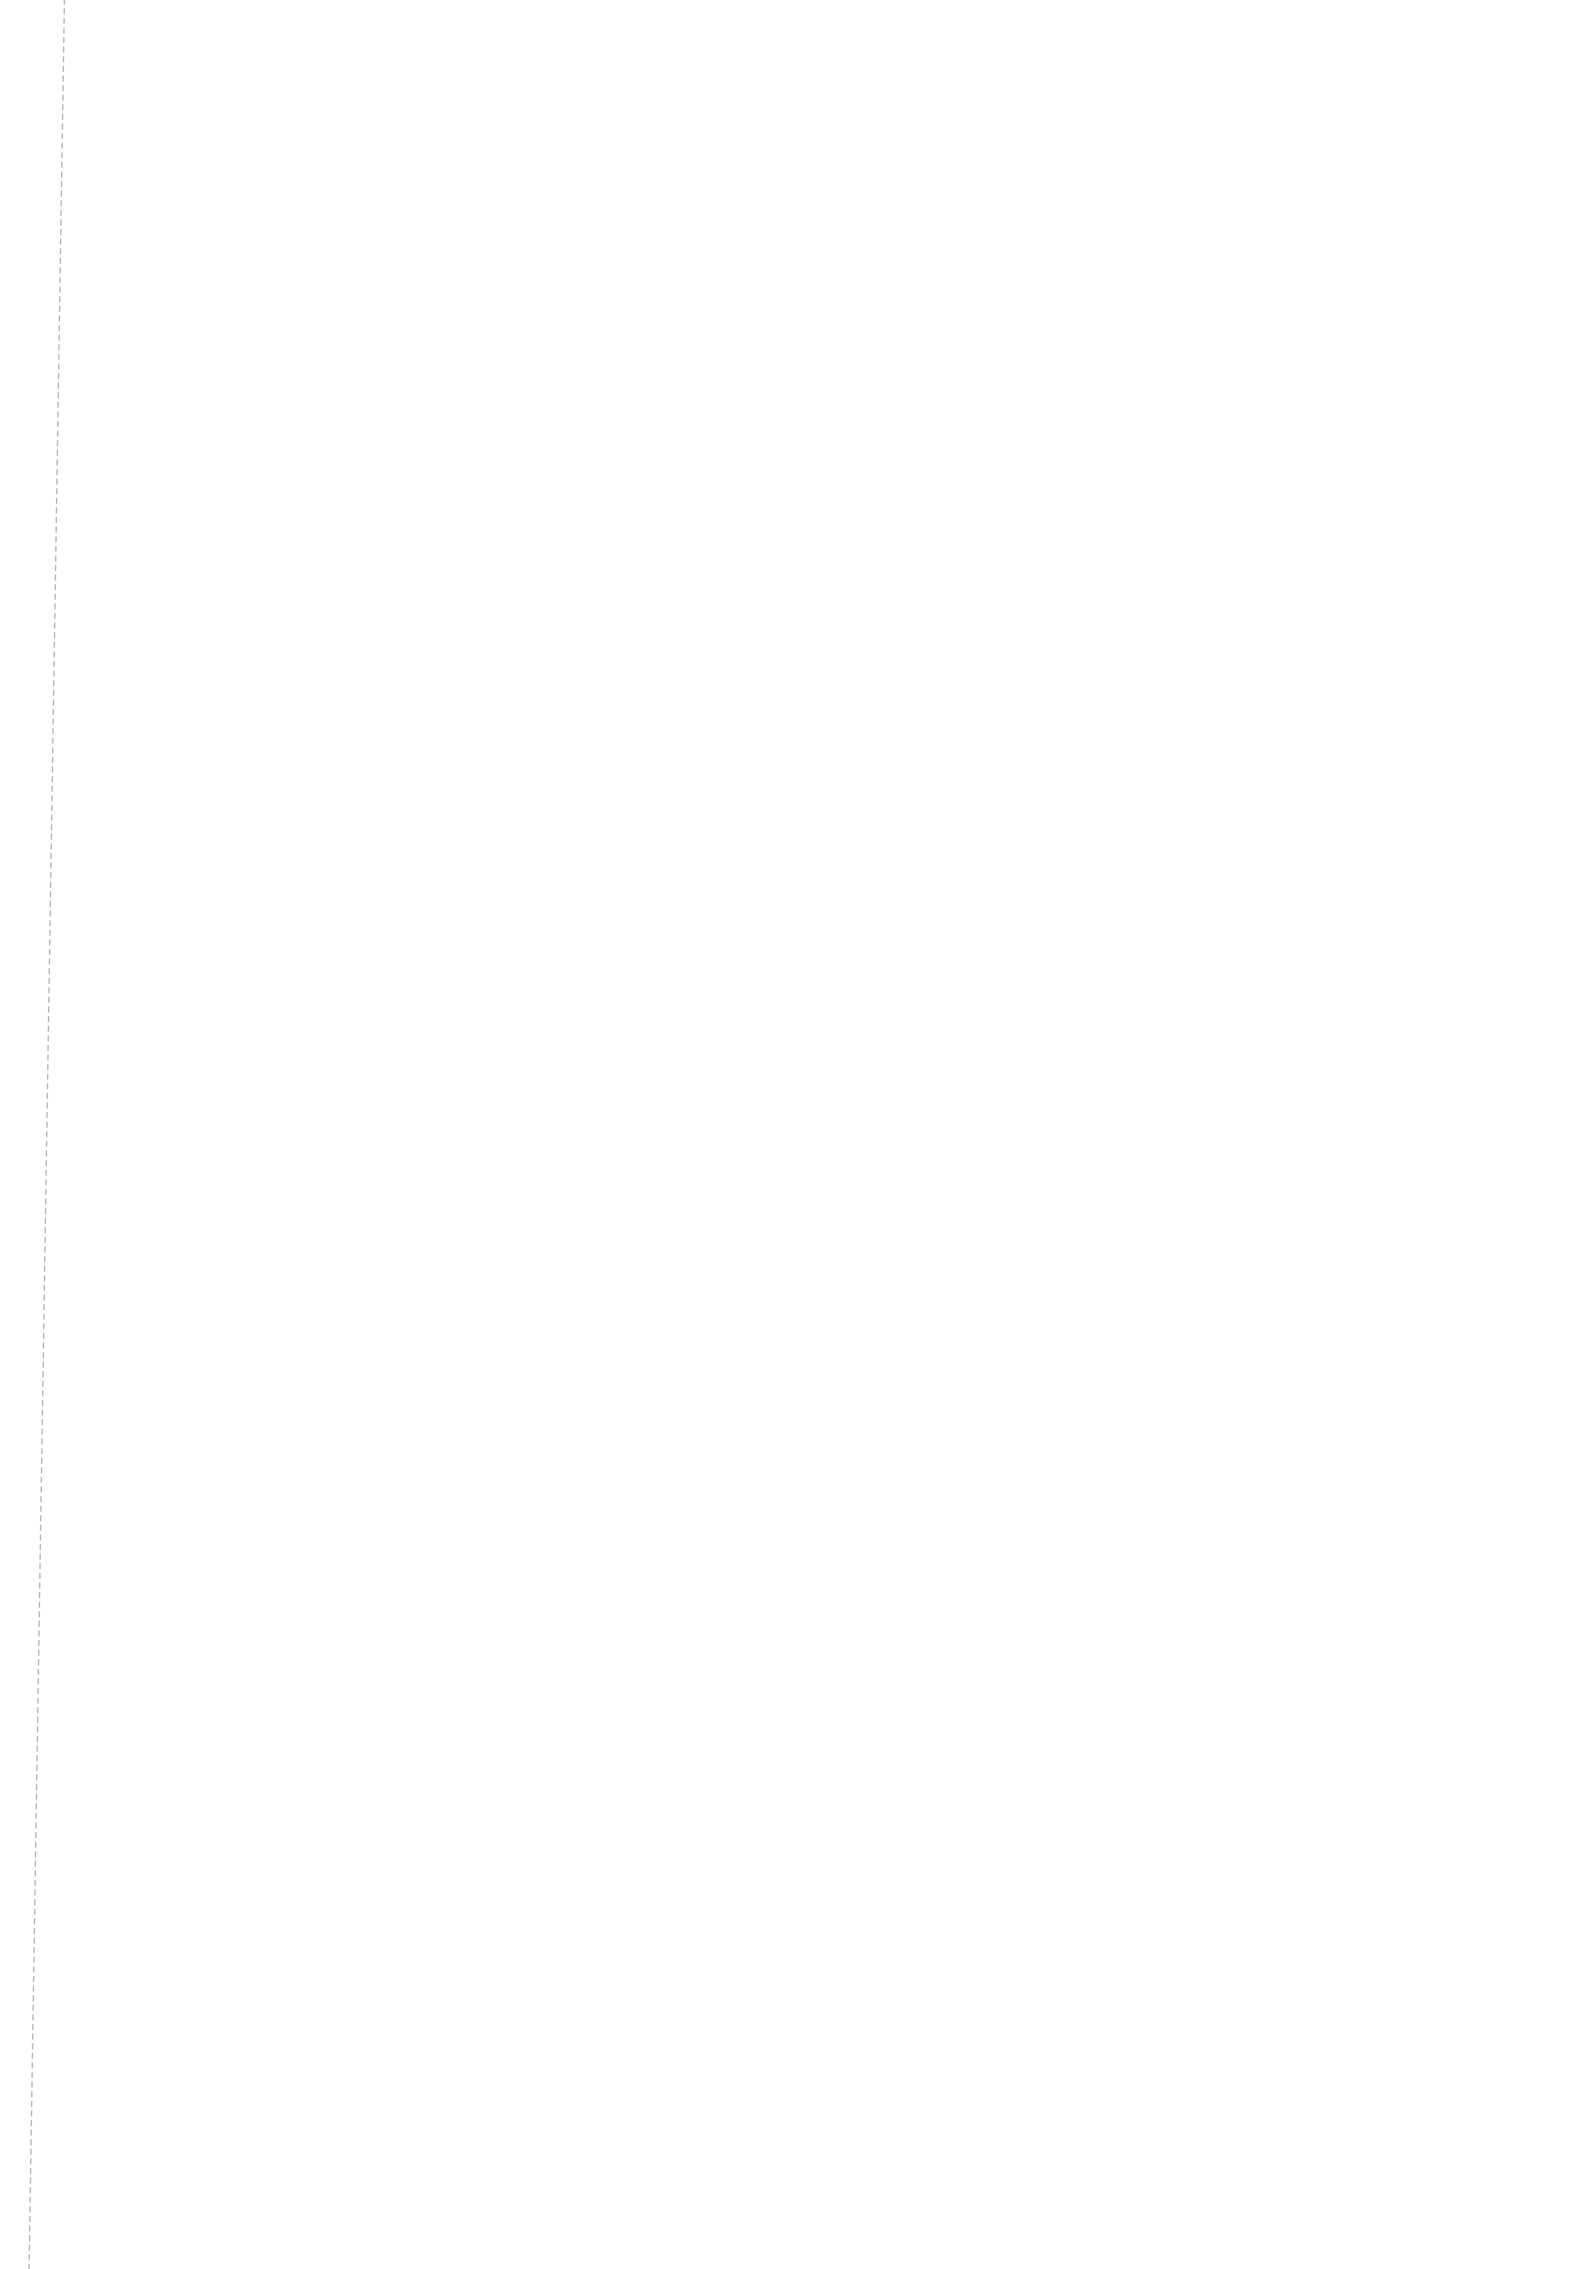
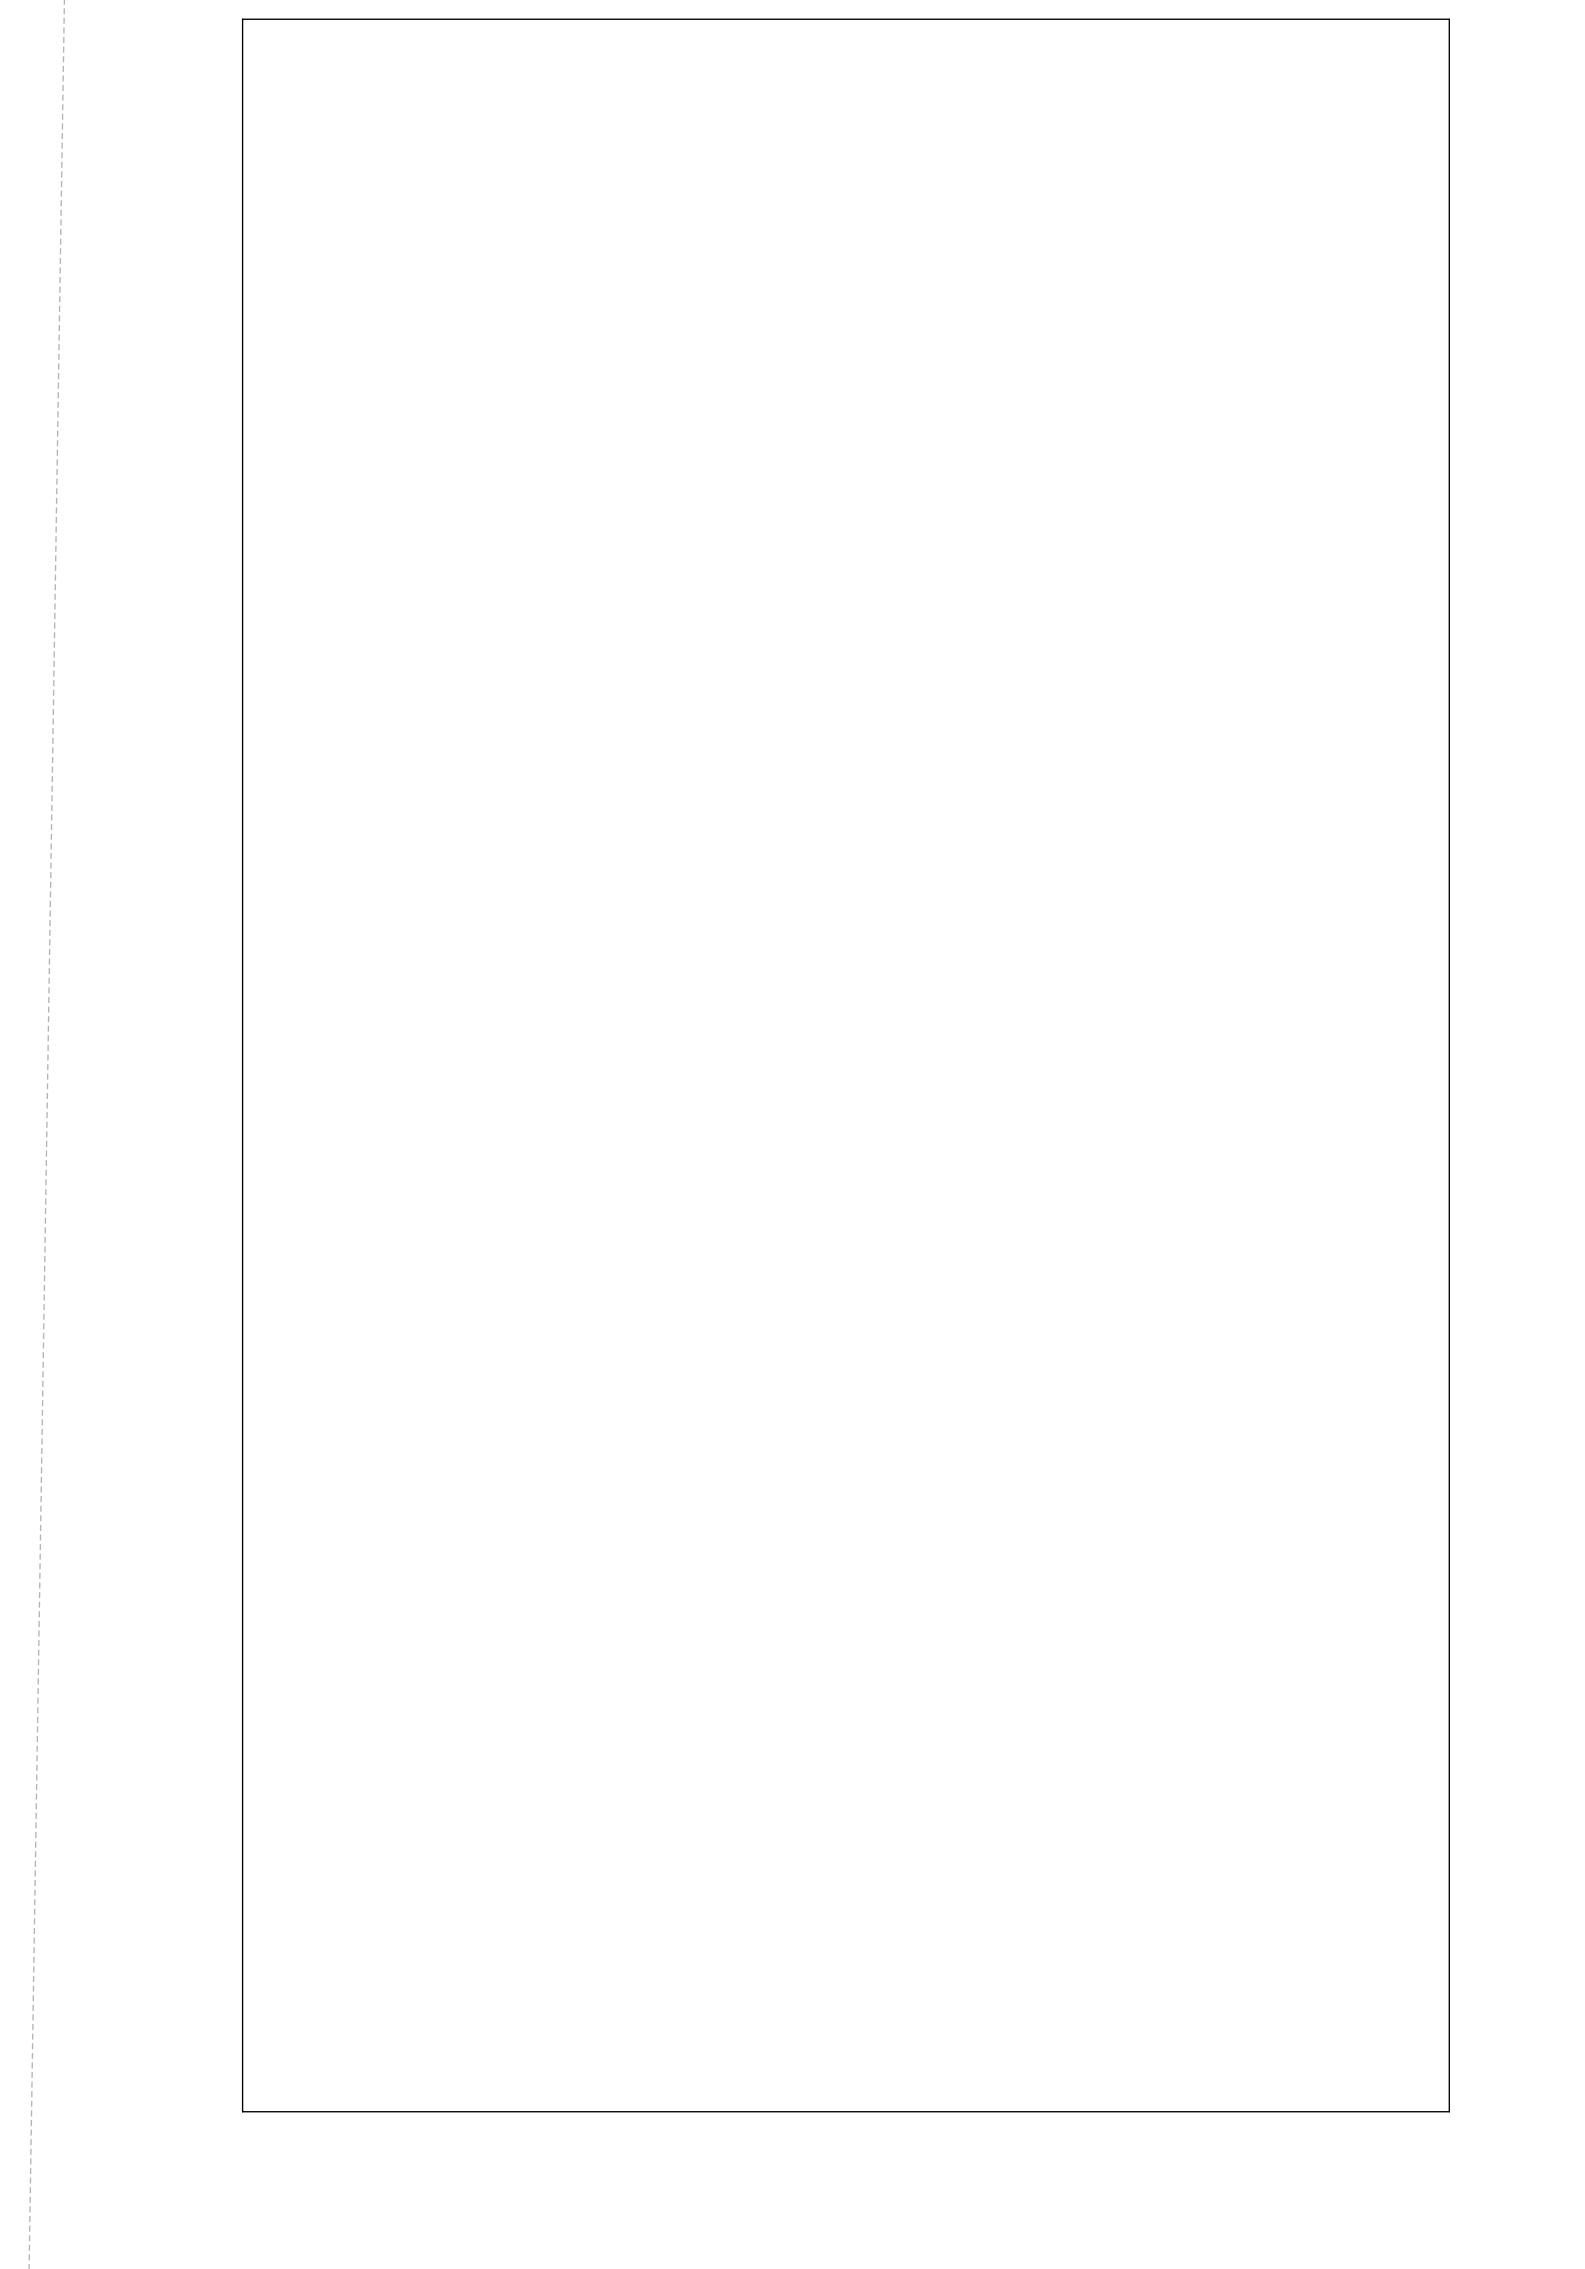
board edge: none -> (242, 19) (1449, 19) (1449, 2111) (242, 2111) (242, 19)

